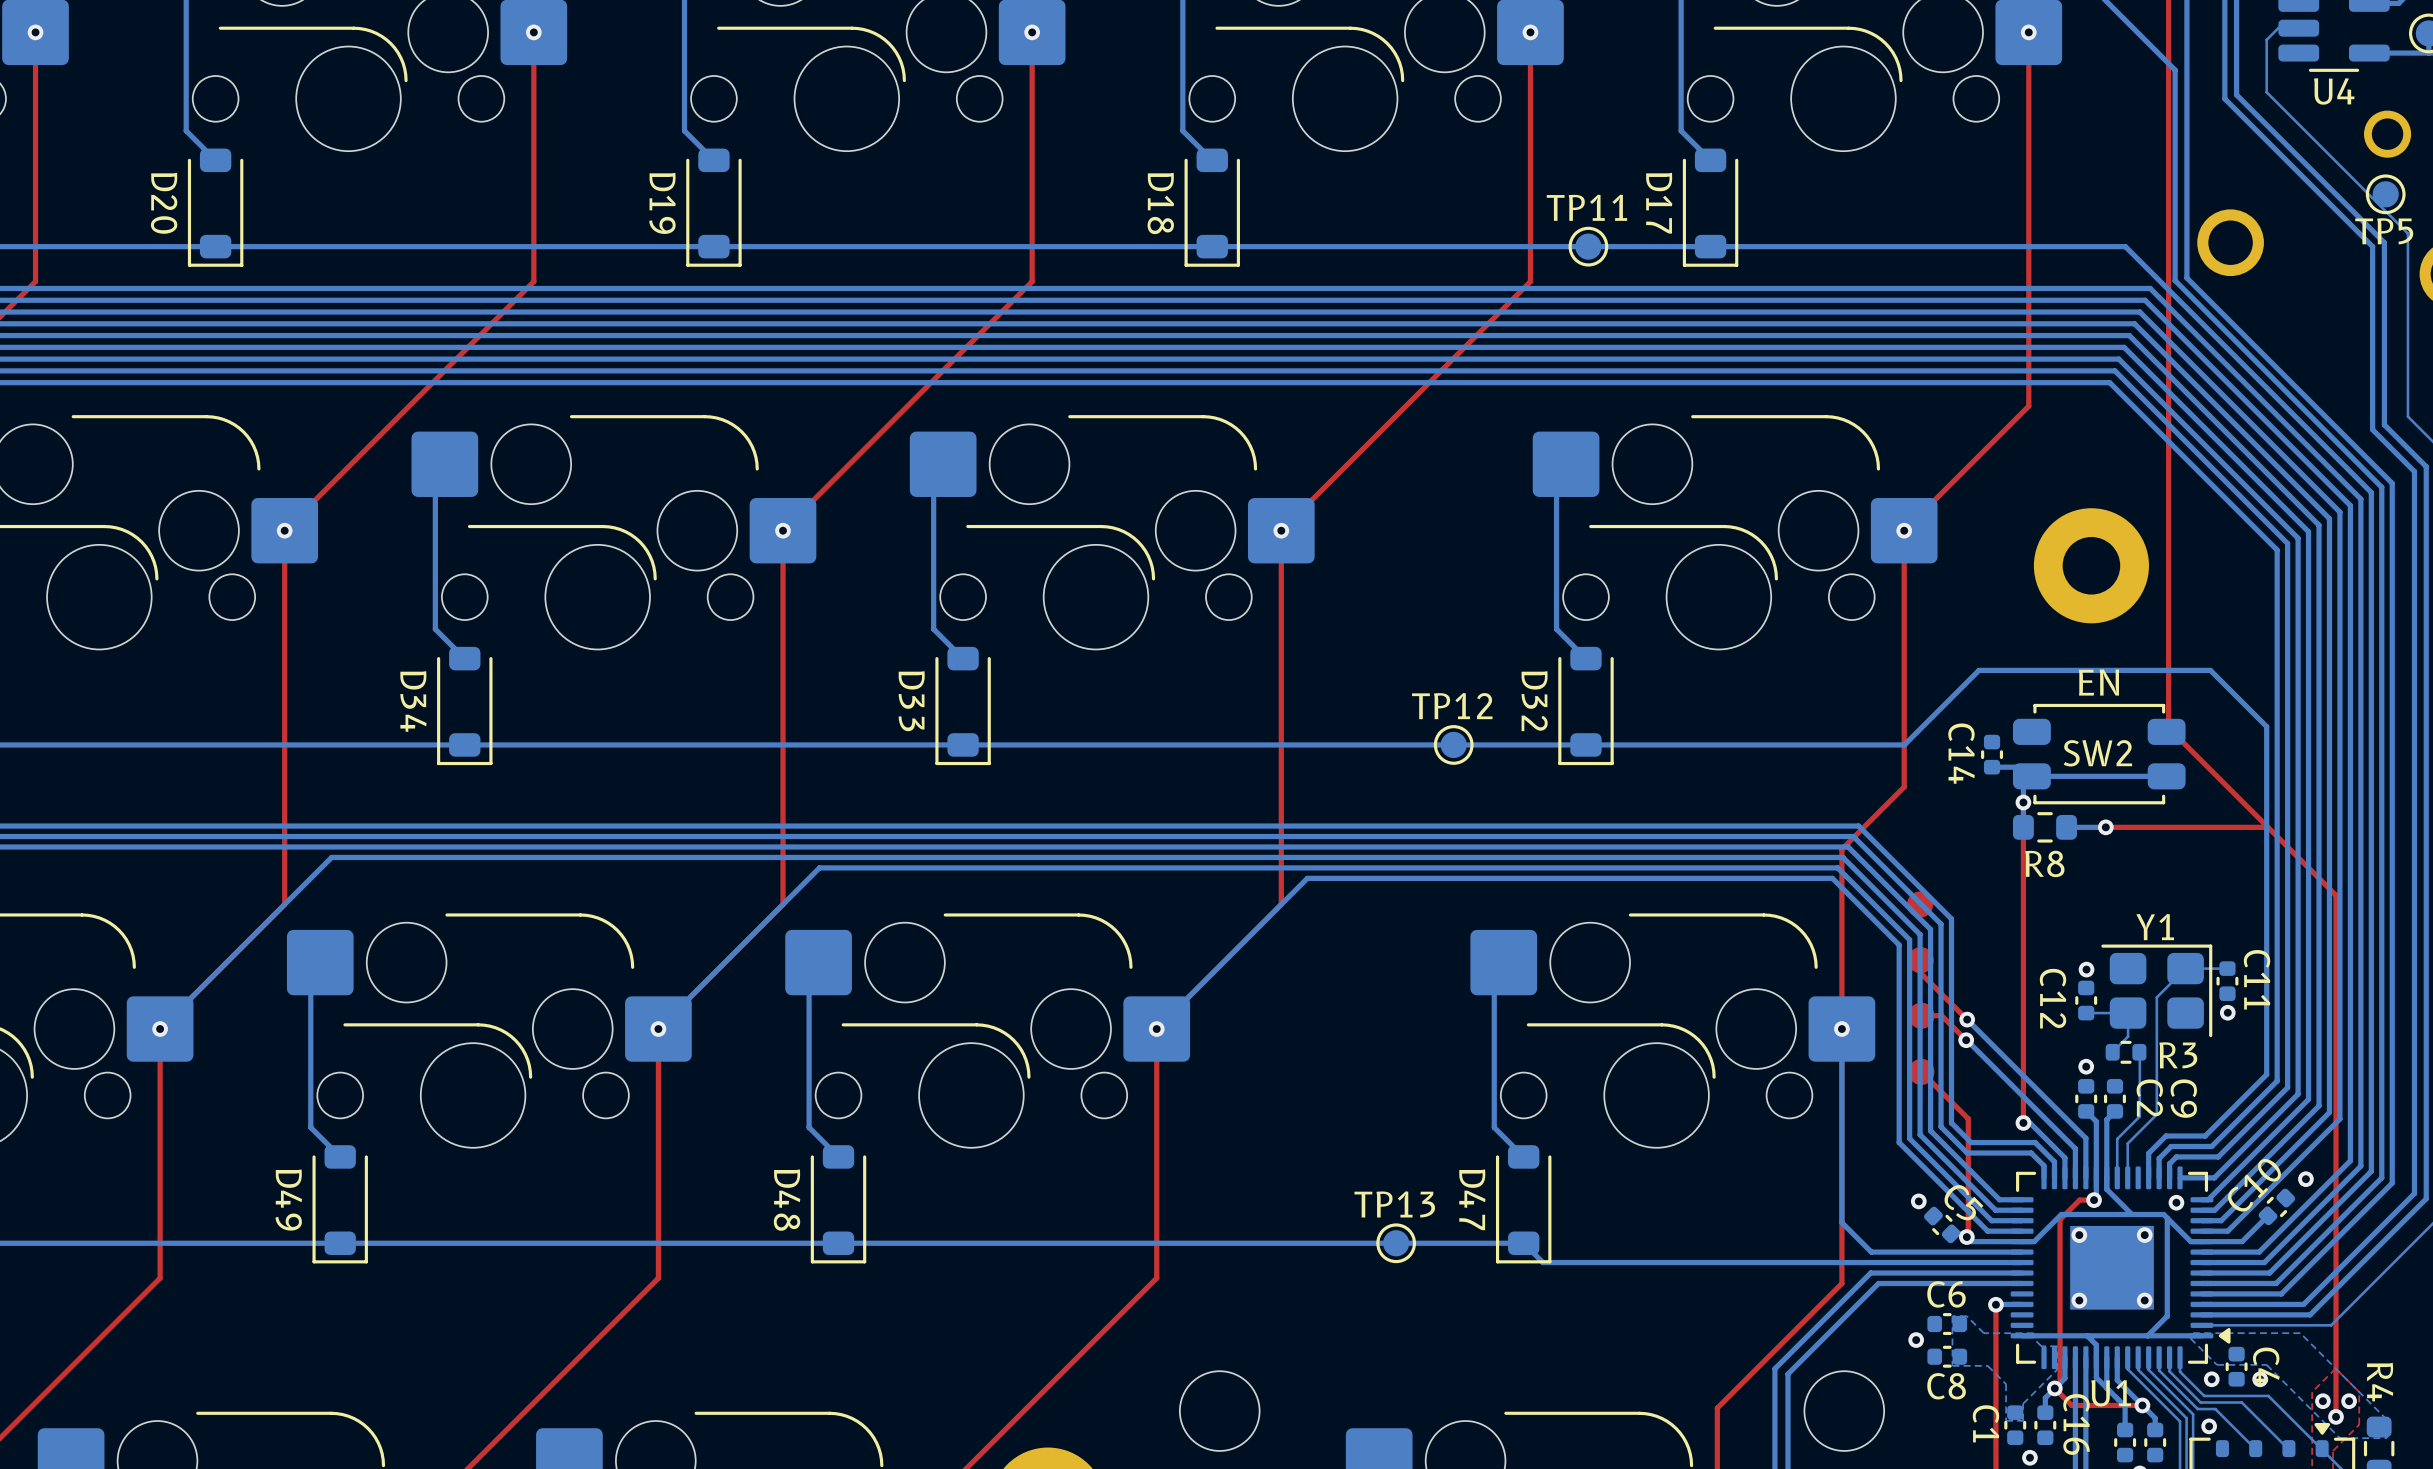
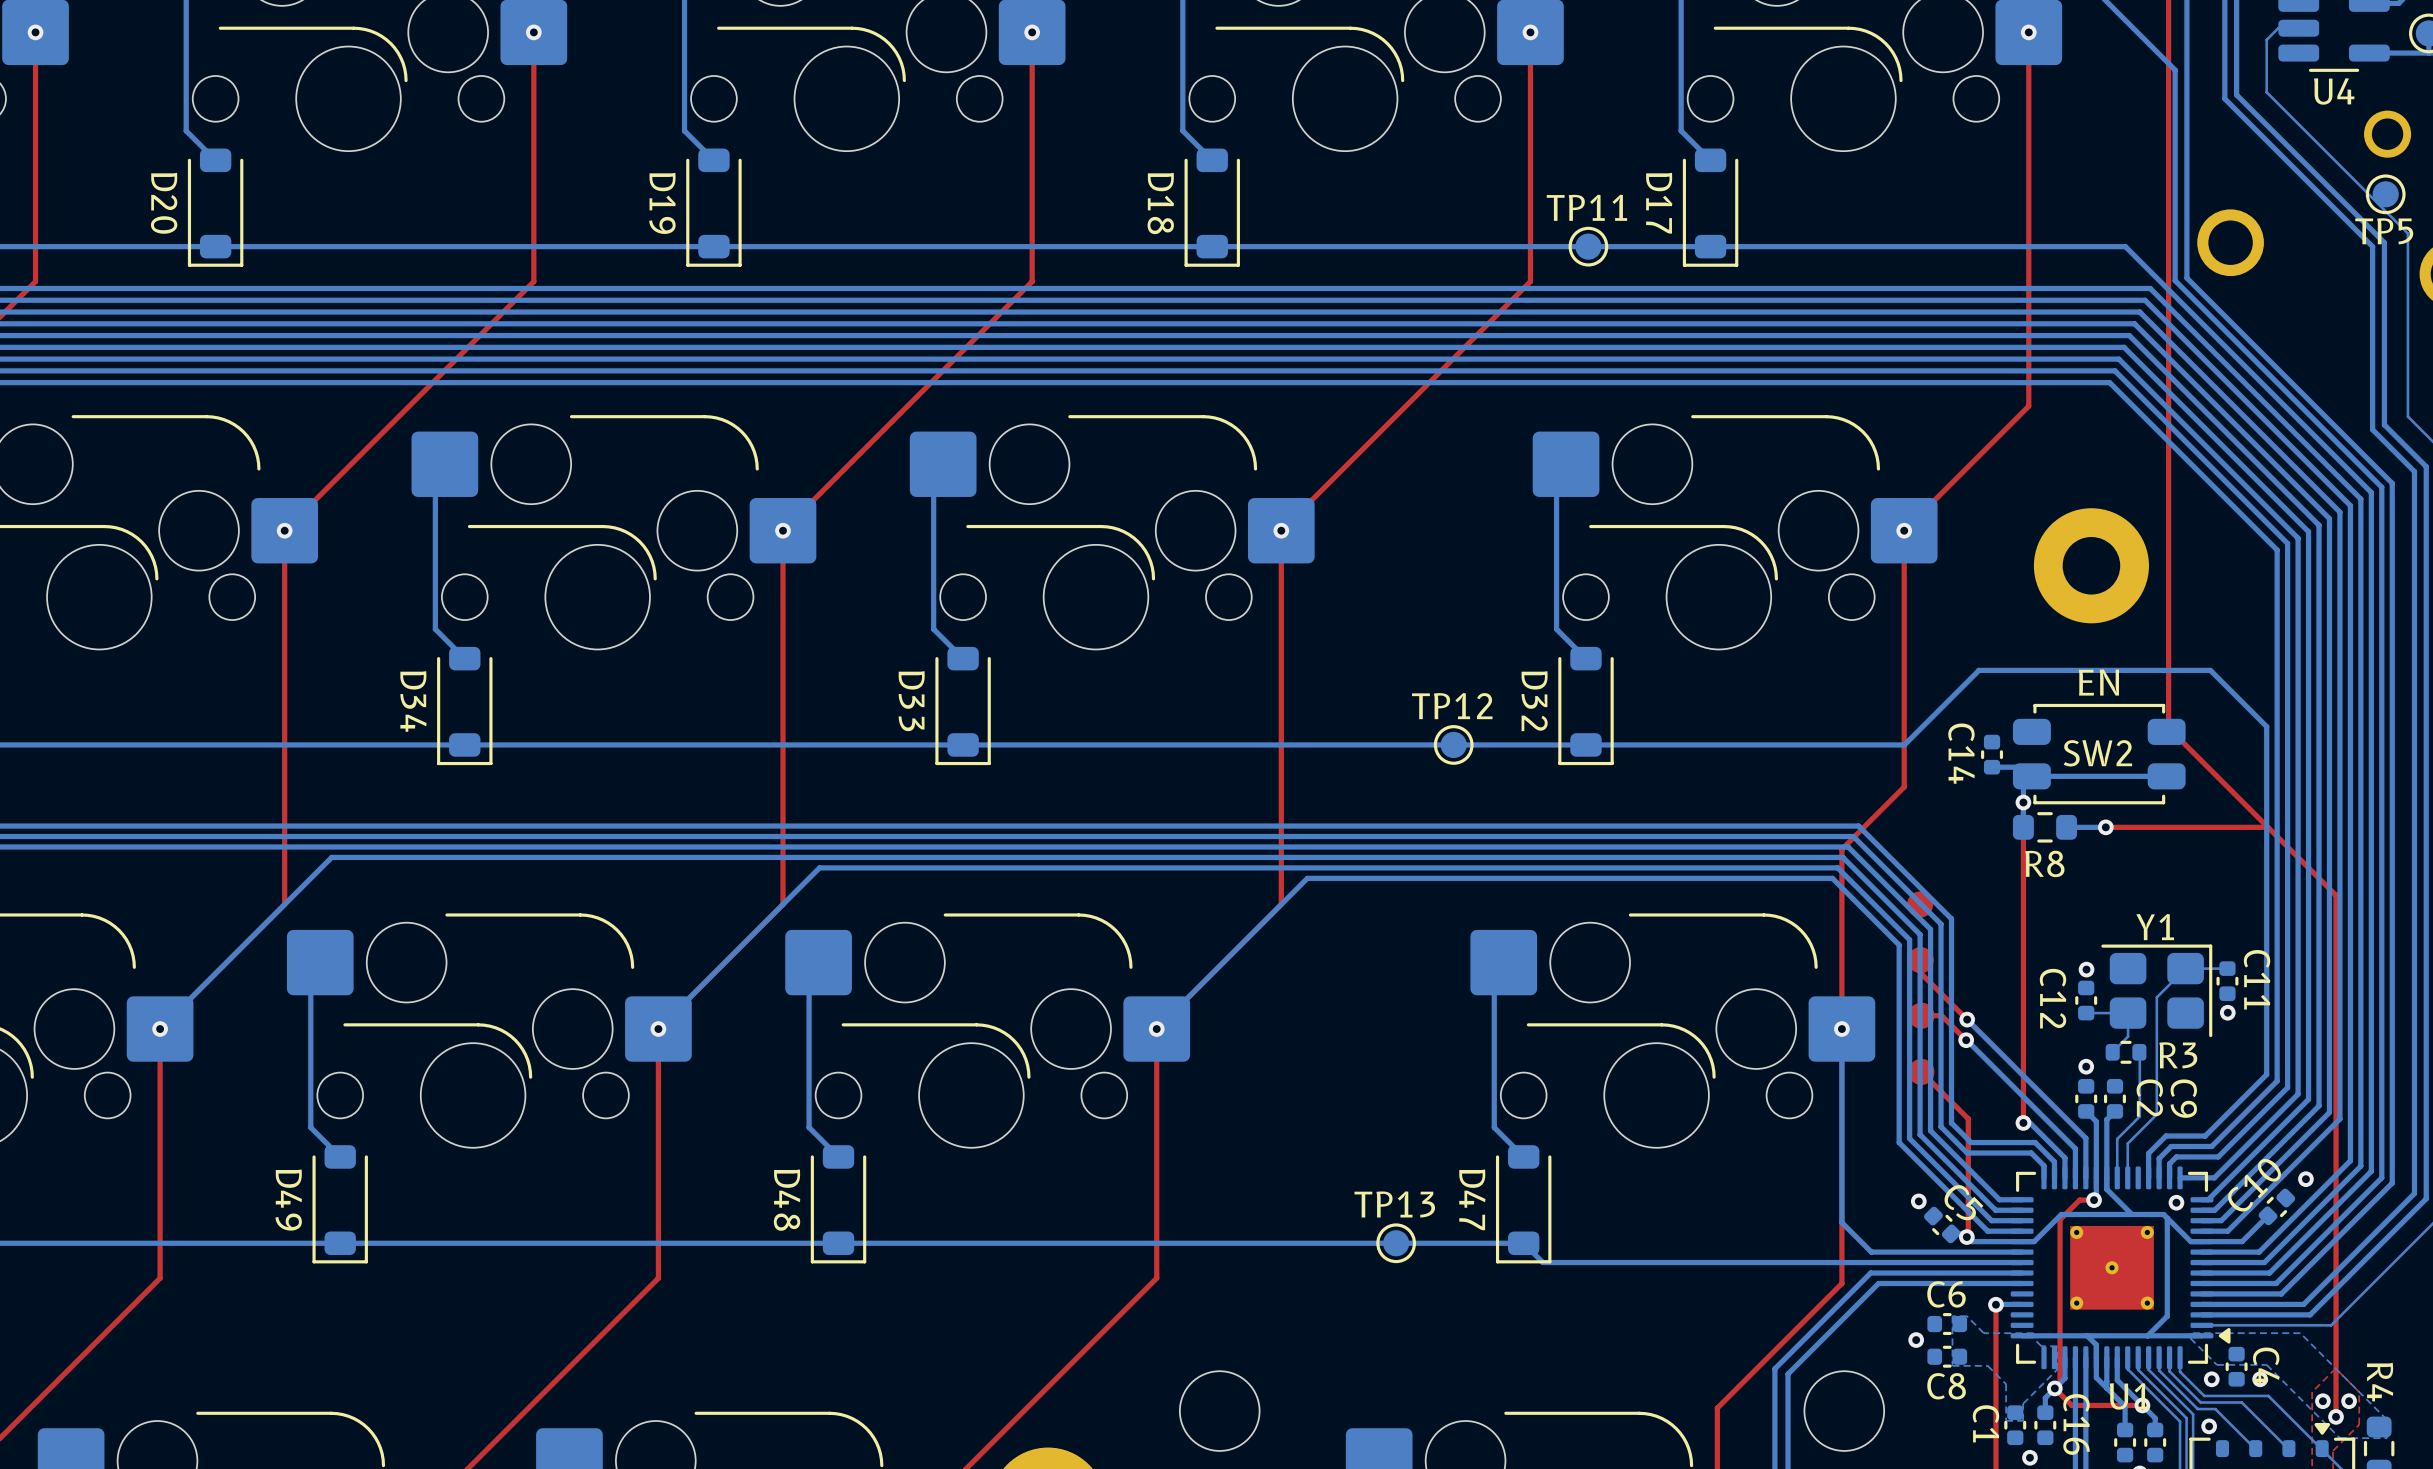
U1 footprint: [2010, 1166, 2231, 1370] -> [2010, 1166, 2231, 1370]
via: (2079, 1235) -> none
via: (2144, 1235) -> none
via: (2079, 1300) -> none
via: (2144, 1300) -> none

